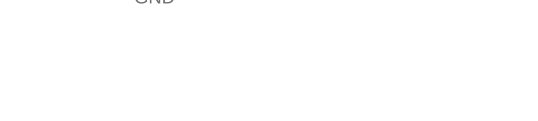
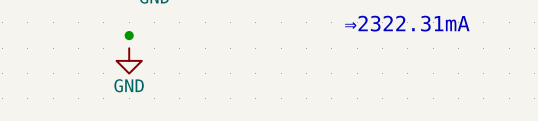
text: none -> ⇒2322.31mA (407, 23)
junction: none -> (129, 35)
power symbol: none -> GND (129, 60)

